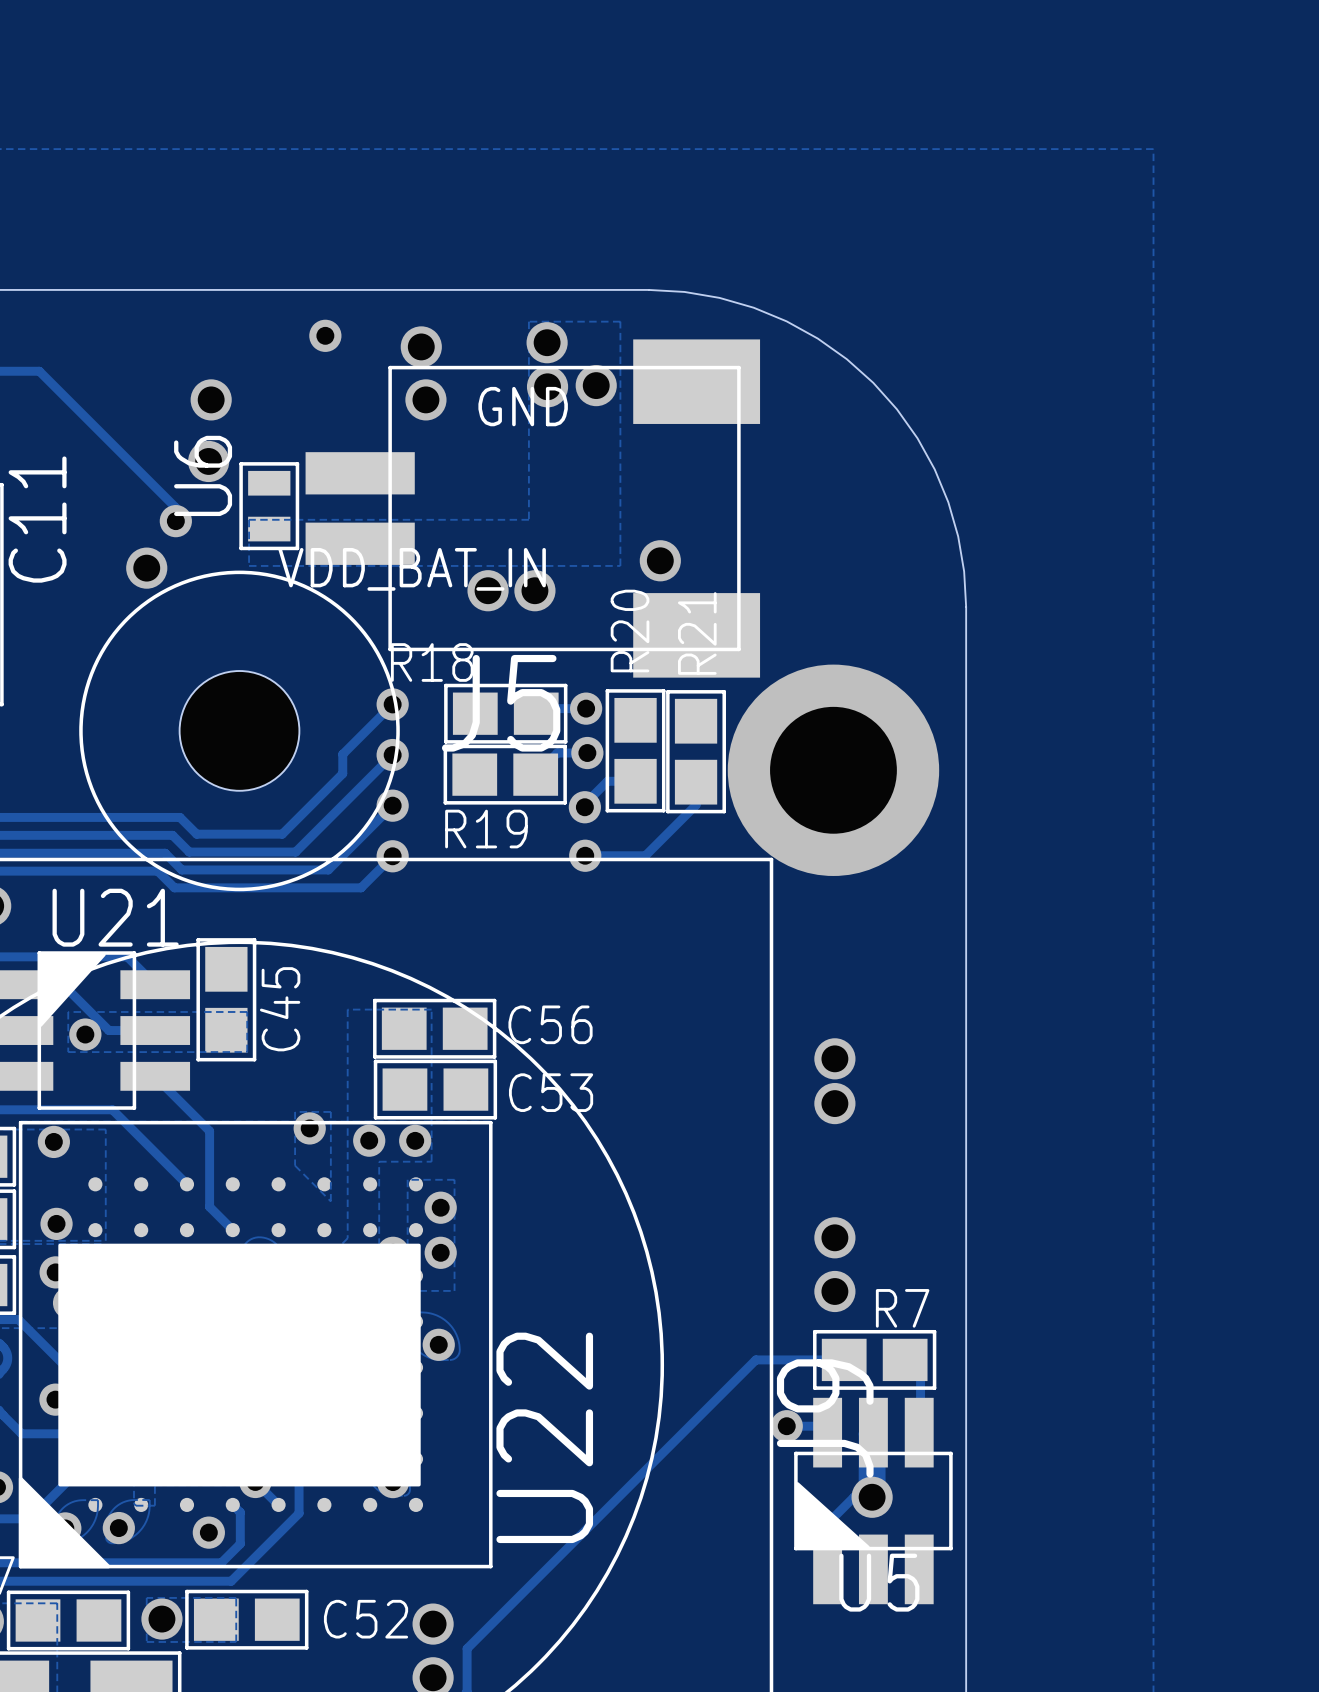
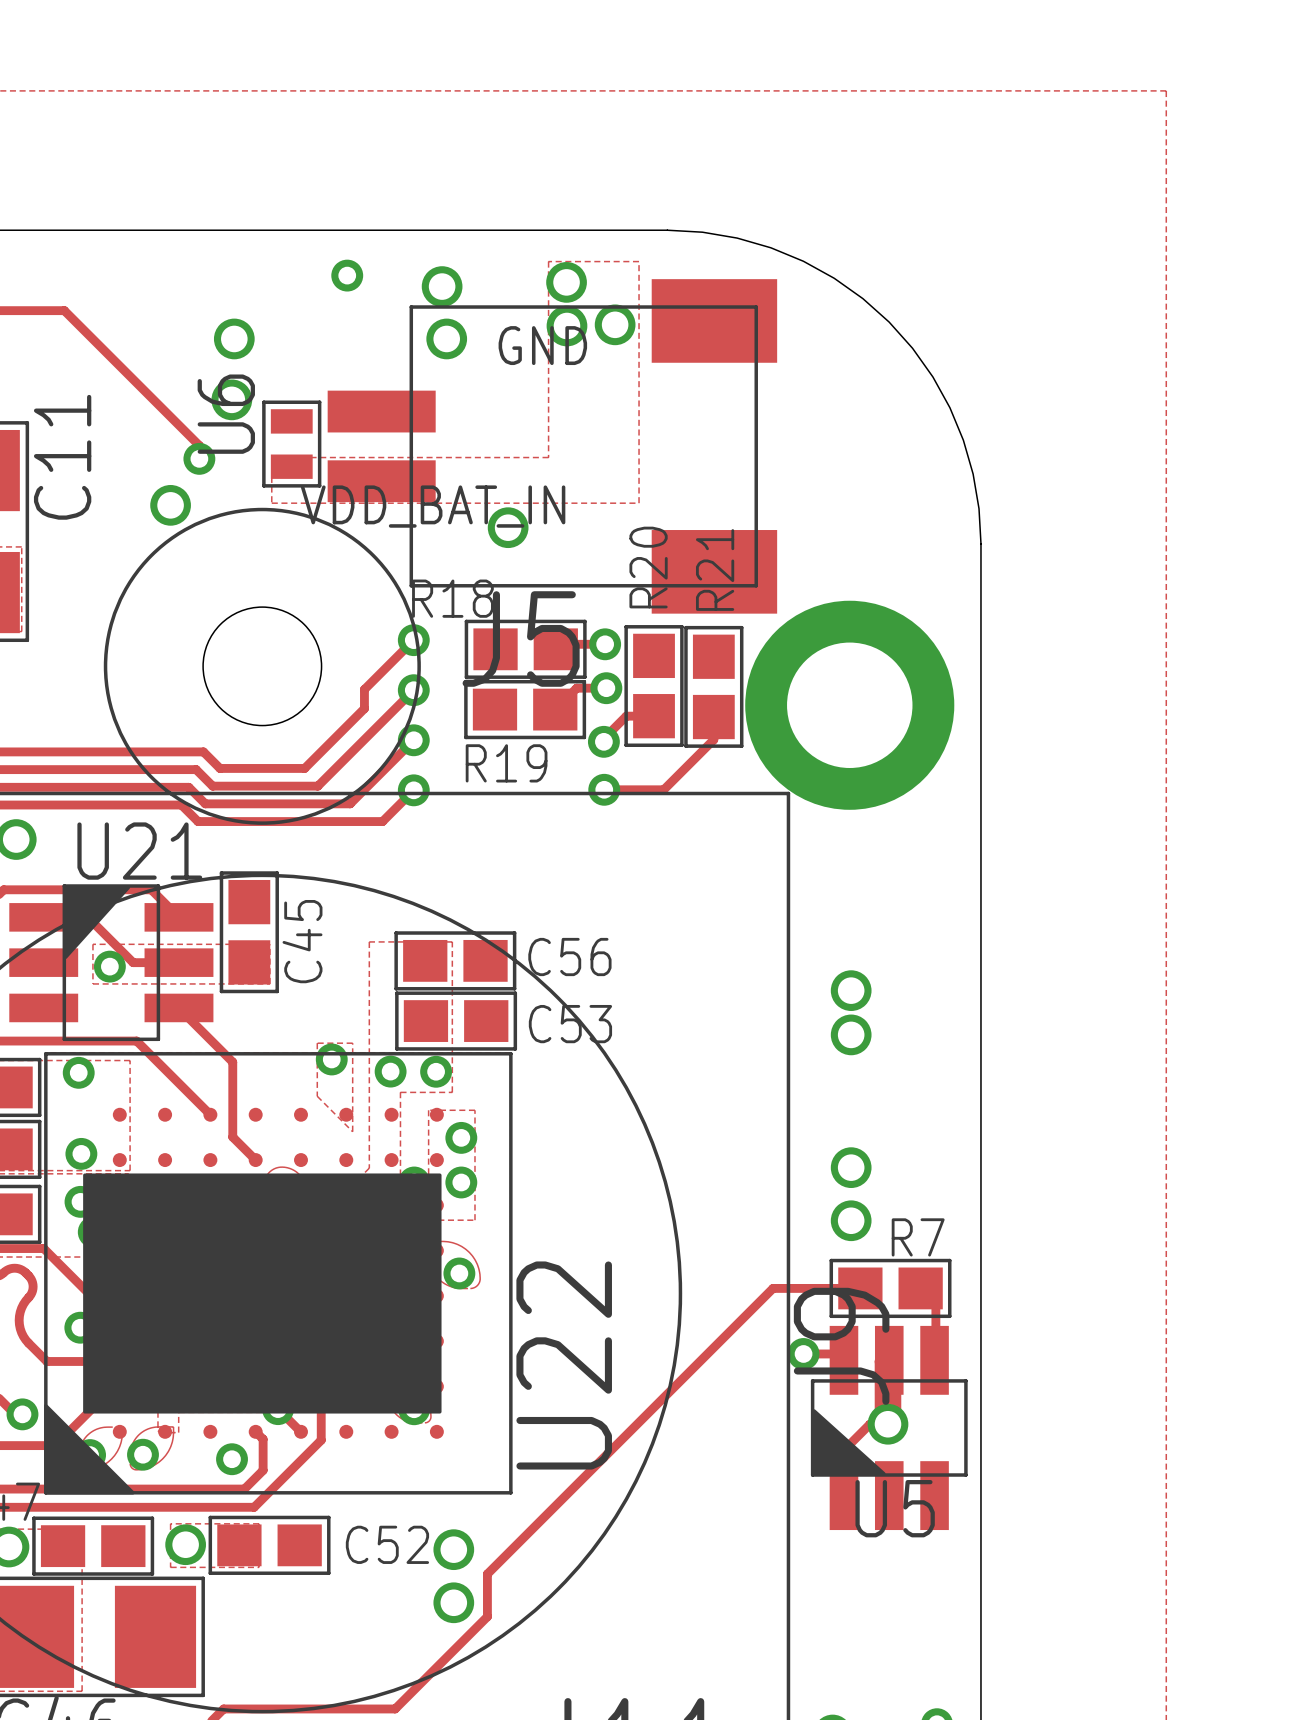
via: (660, 560) -> none
via: (534, 590) -> none

